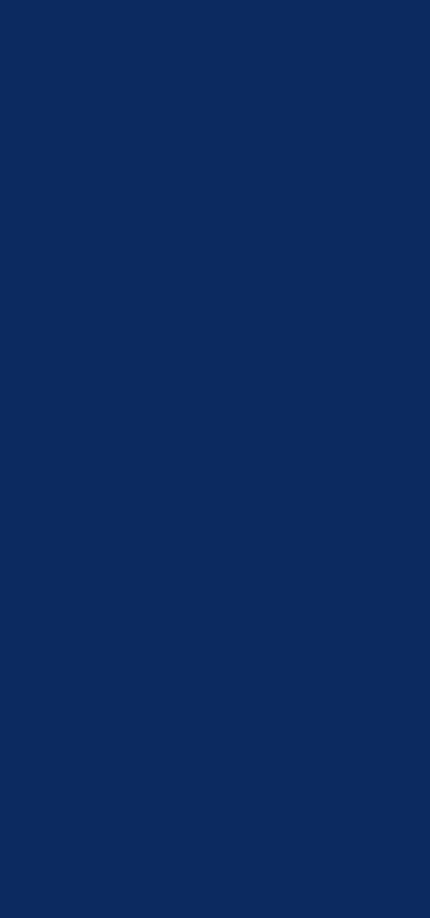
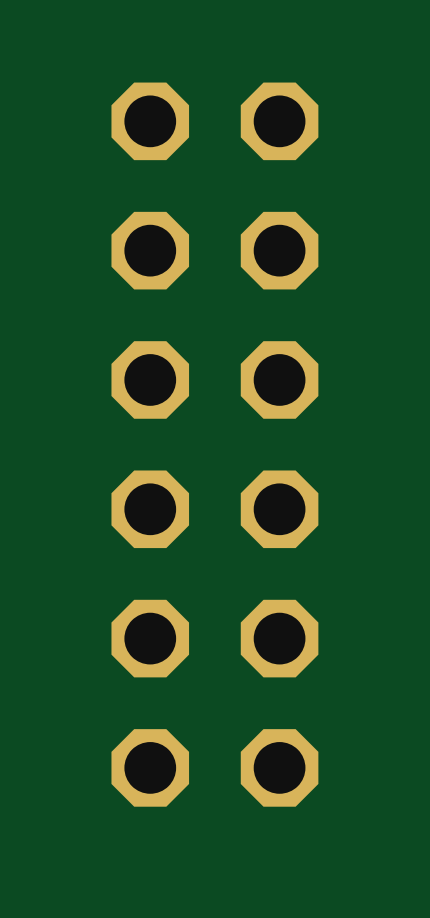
part: none -> (214, 444)

